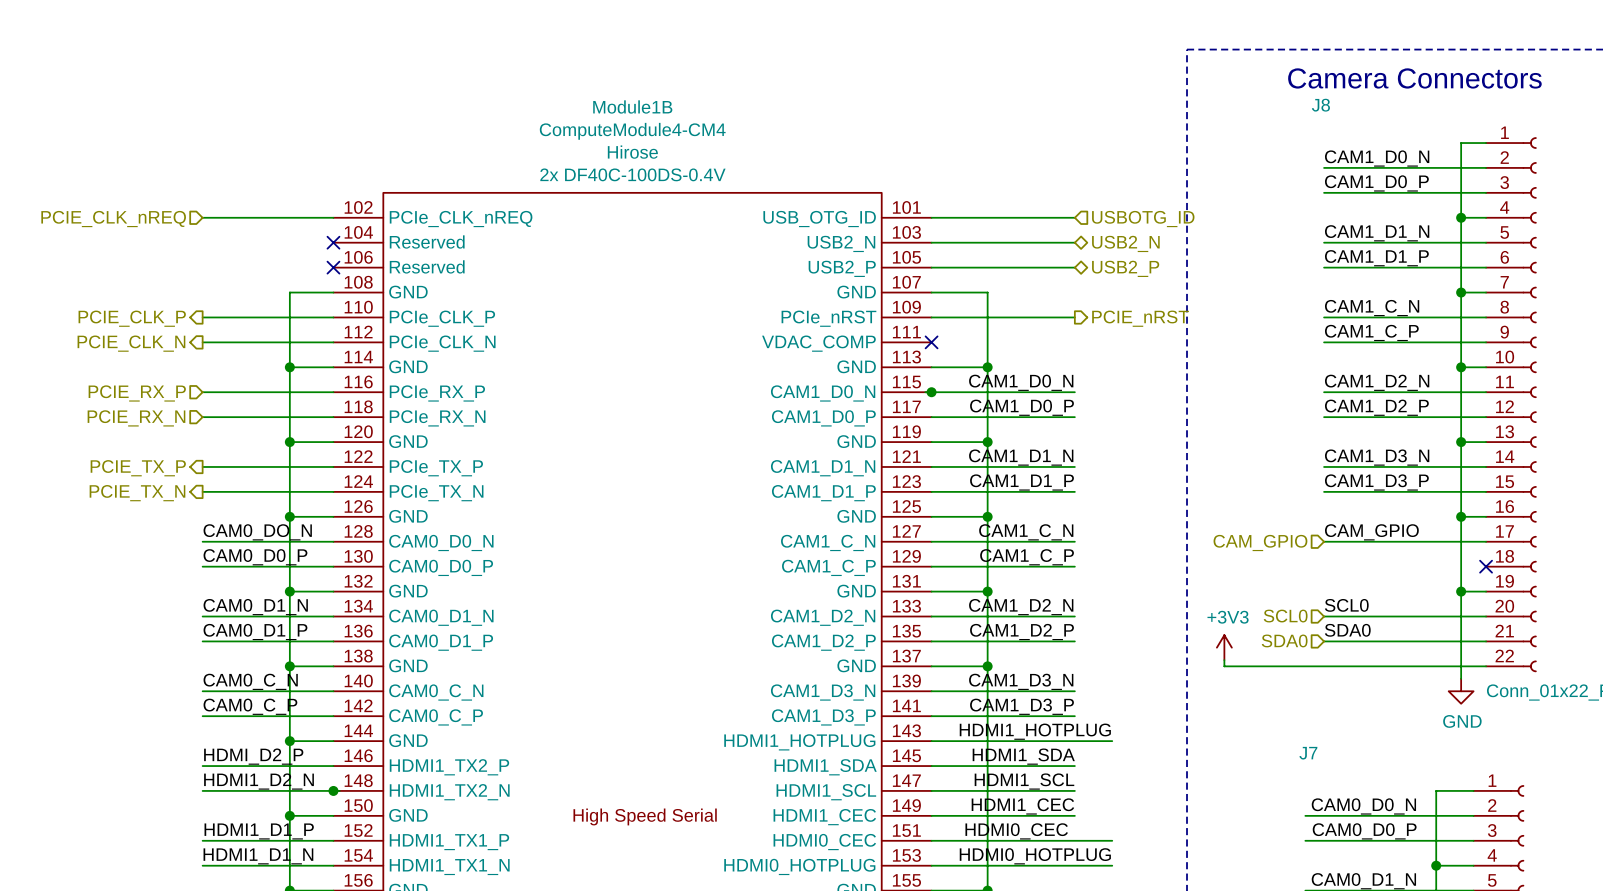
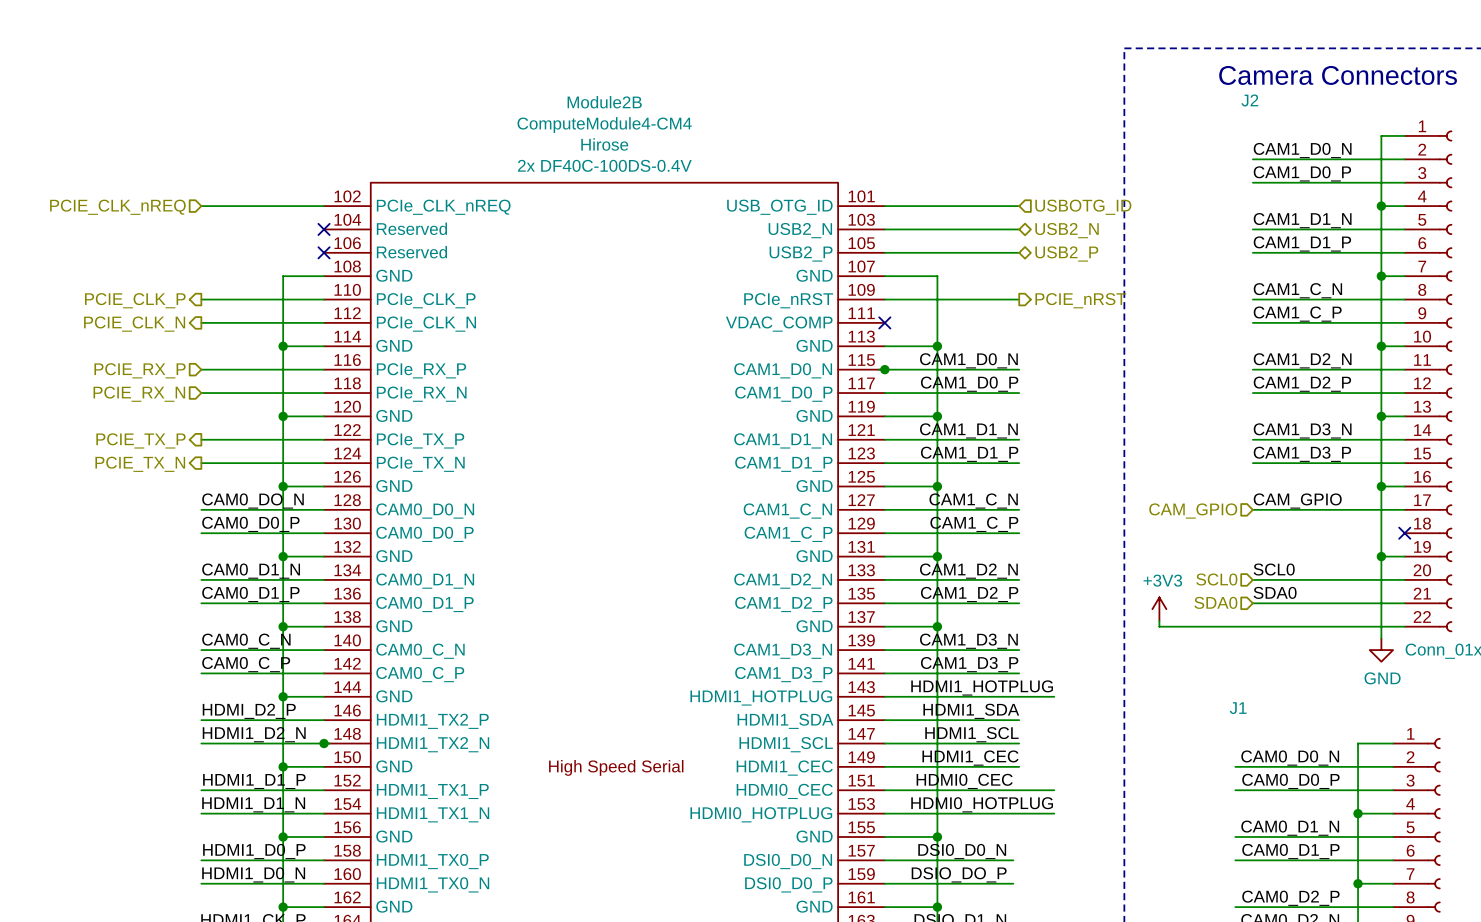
J8 name: J8 (1320, 105) -> J2 (1249, 100)
Module1B name: Module1B (632, 106) -> Module2B (604, 102)
J7 name: J7 (1308, 753) -> J1 (1238, 708)

